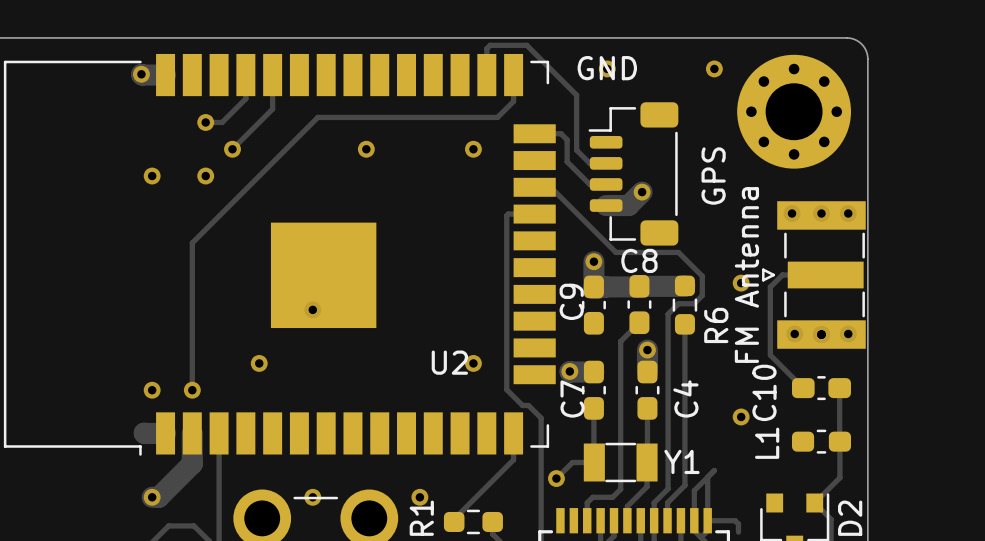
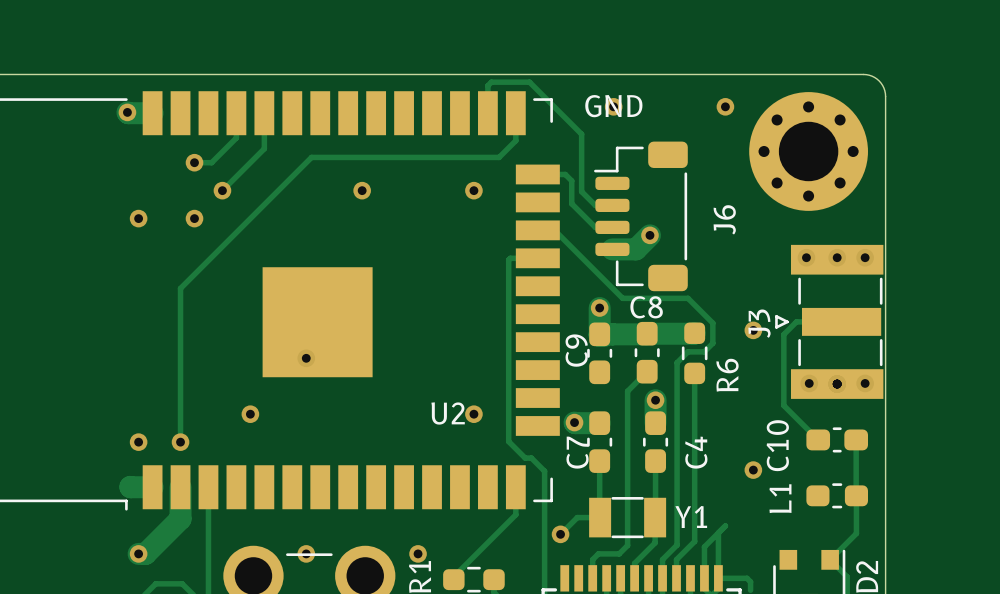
GPS name: GPS (713, 176) -> J6 (724, 219)
FM Antenna name: FM Antenna (746, 275) -> J3 (759, 323)

